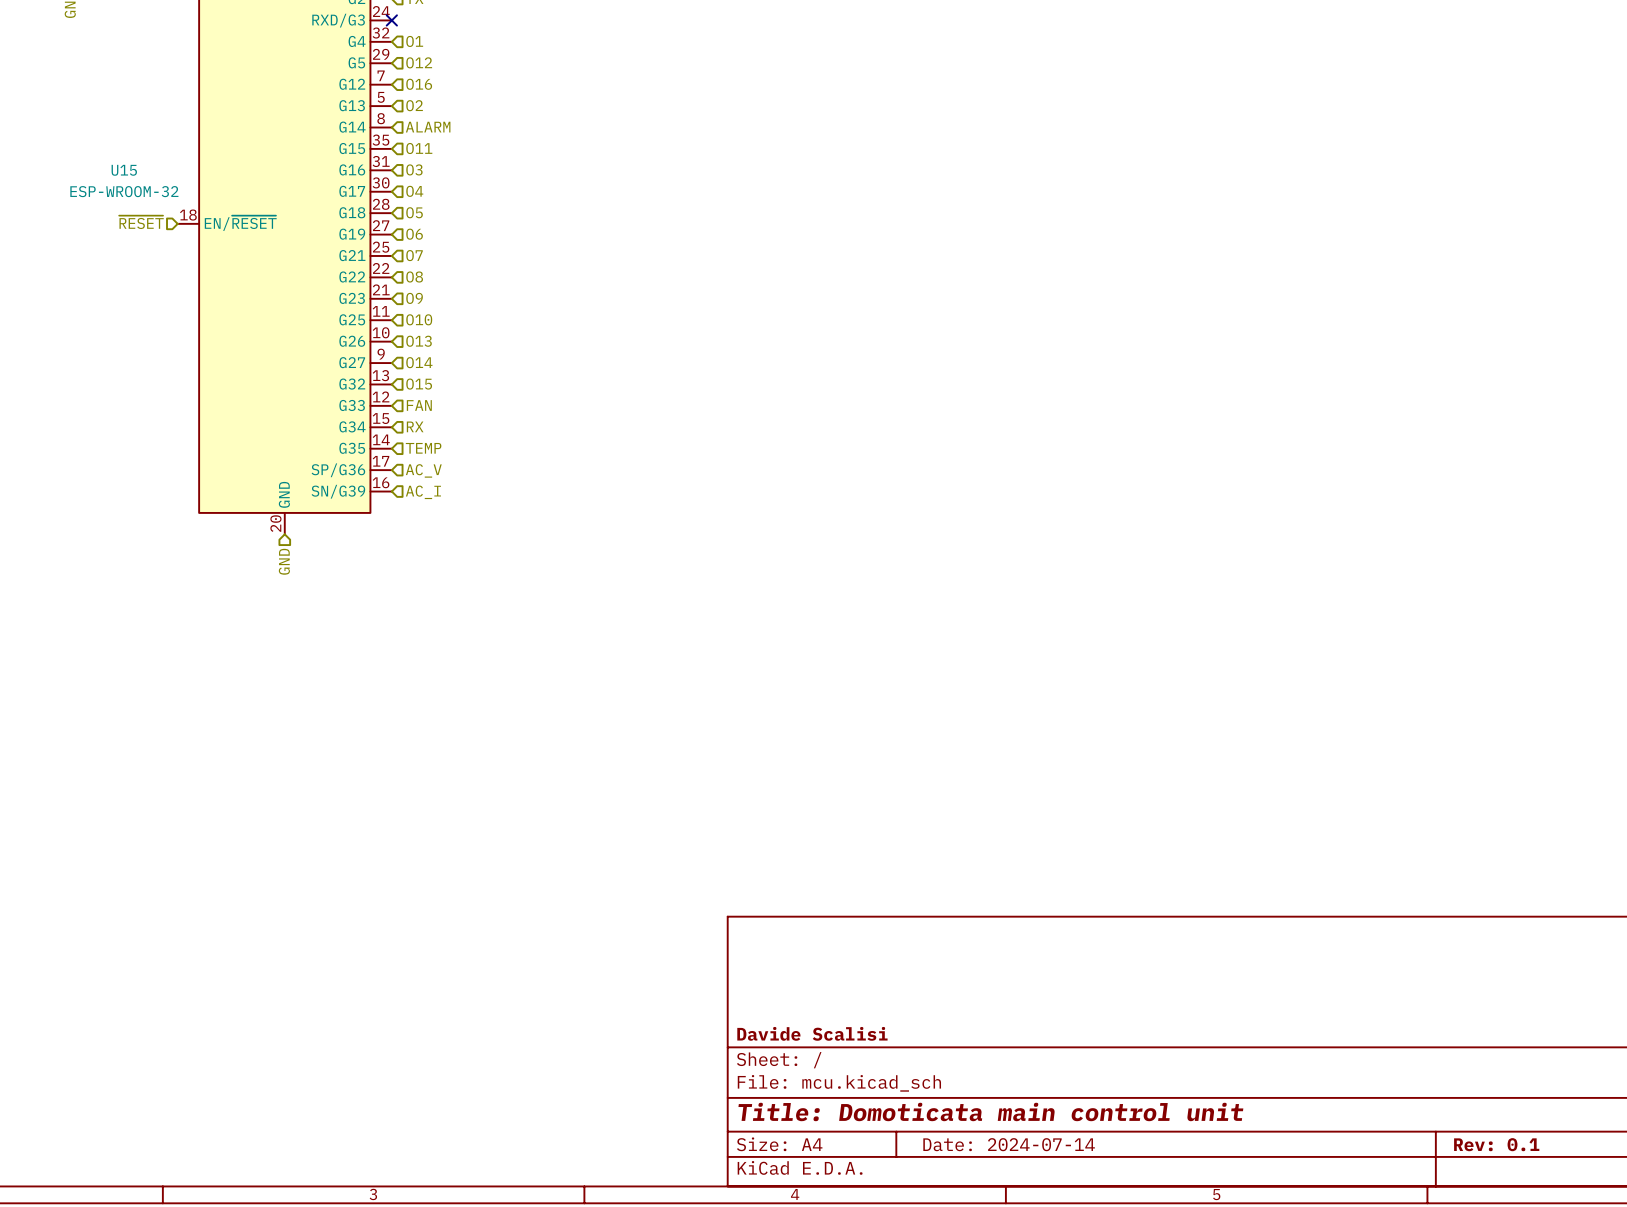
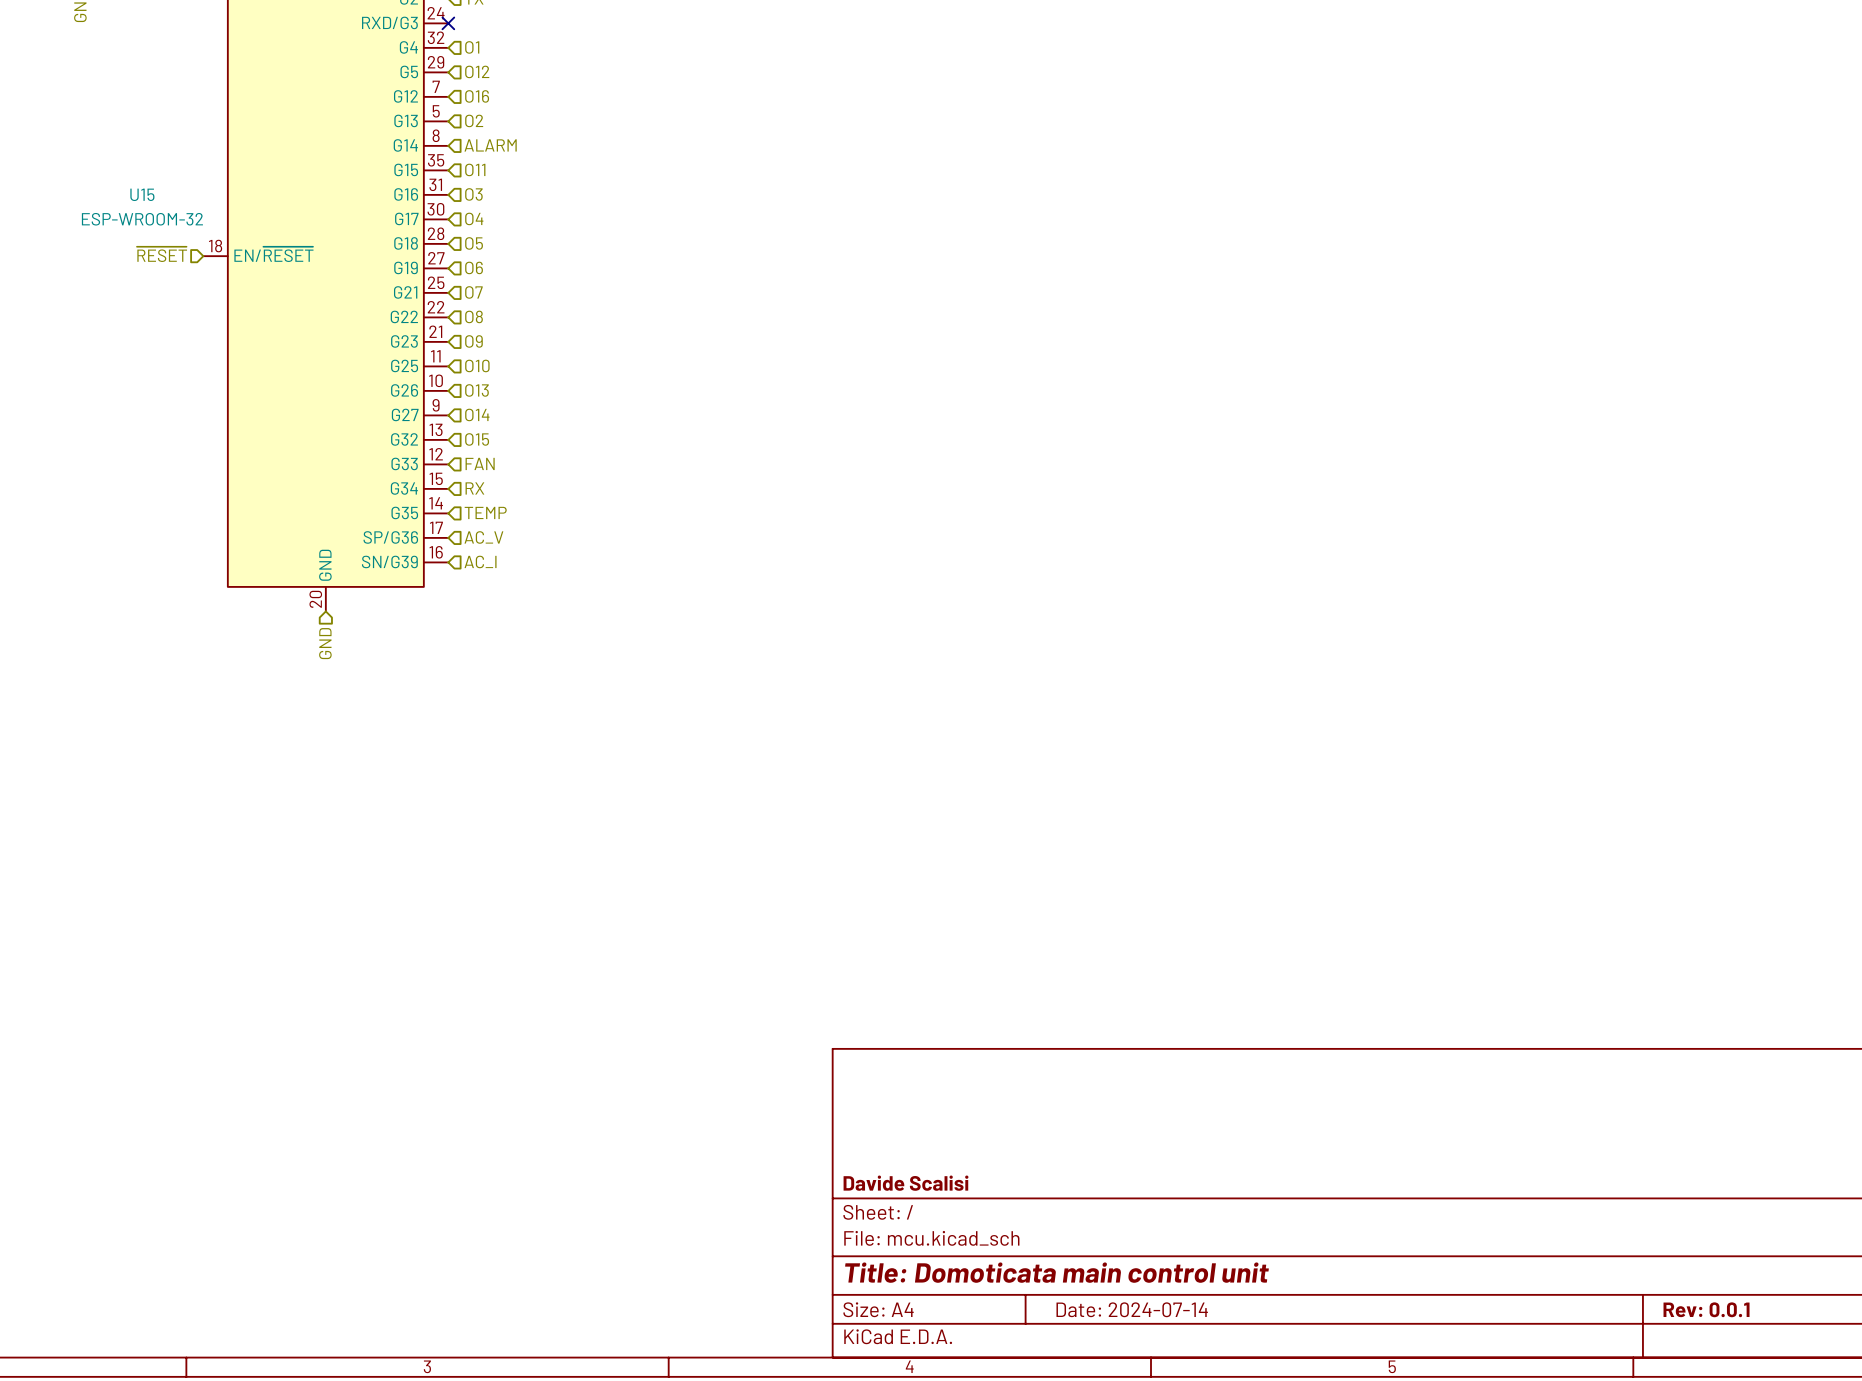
title block: Rev: 0.1 (1496, 1144) -> Rev: 0.0.1 (1706, 1309)

